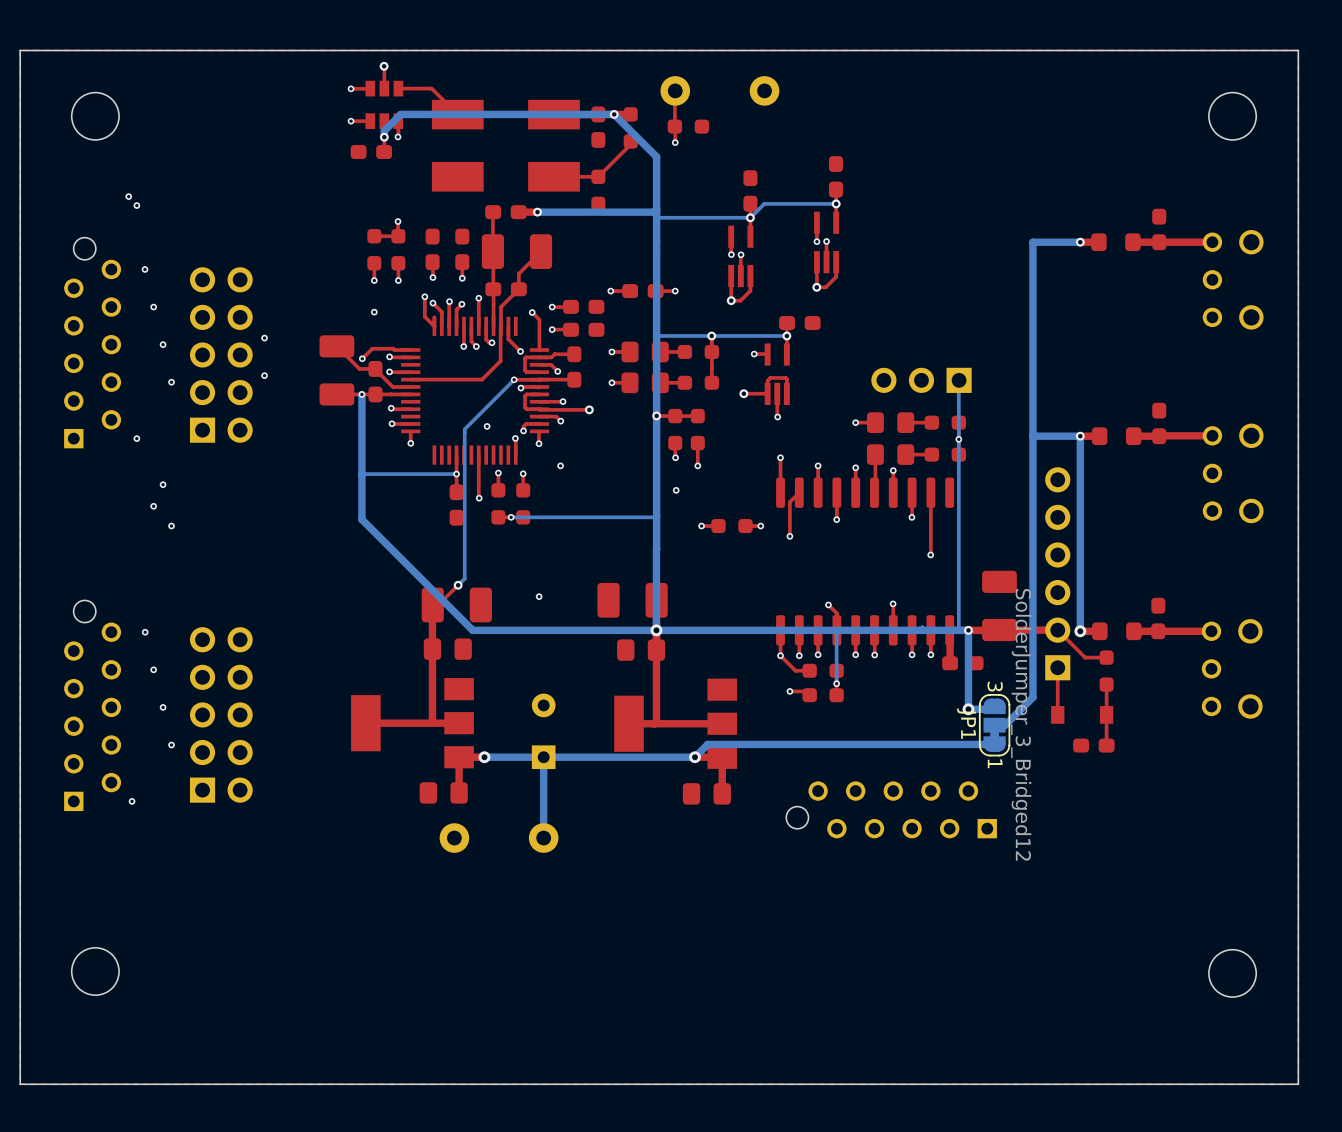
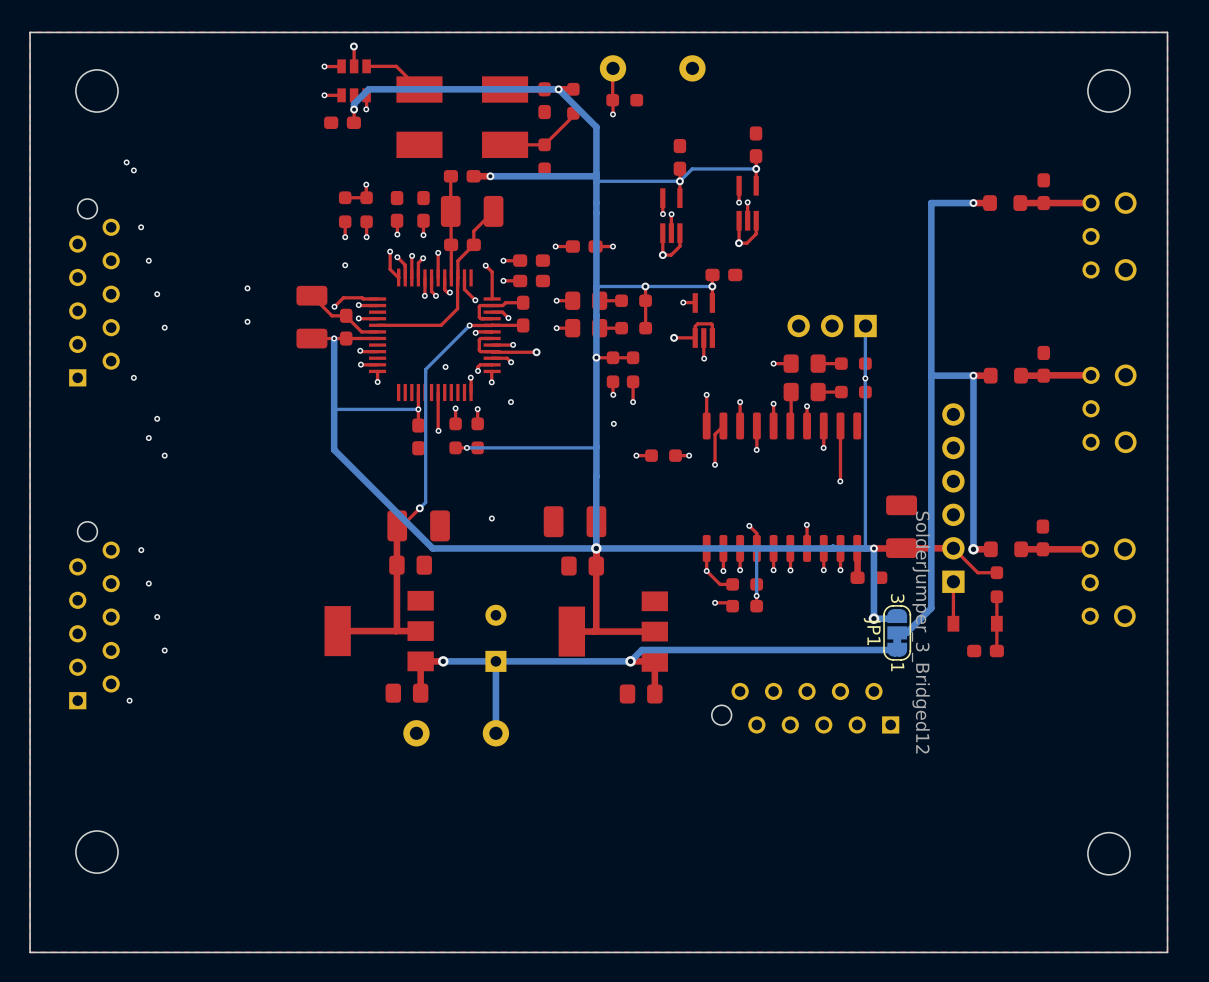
part: (221, 354) -> none
part: (221, 714) -> none

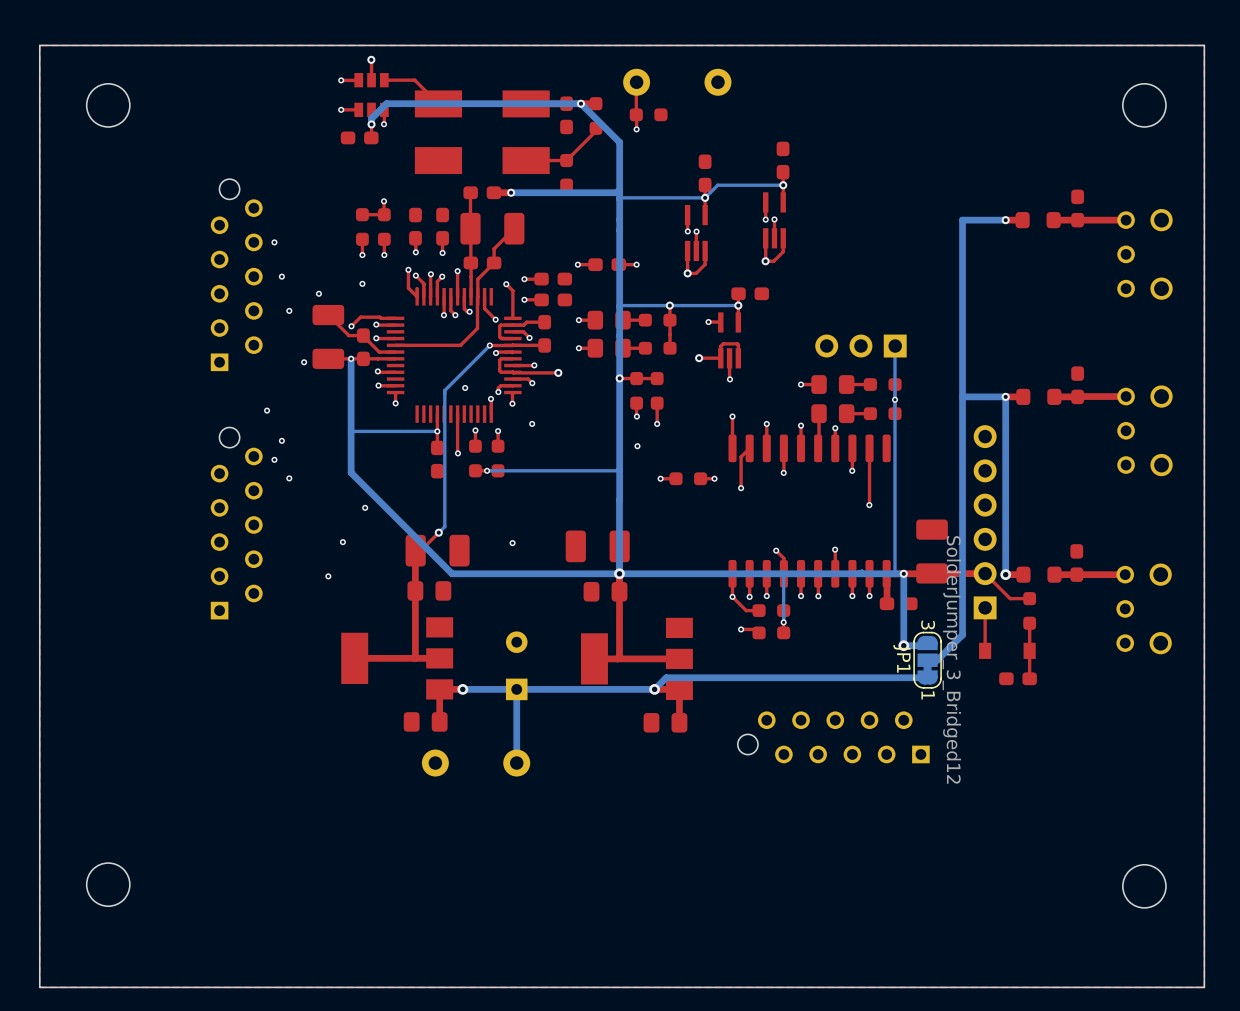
via: (126, 162) -> none
via: (133, 170) -> none
via: none -> (274, 242)
via: (141, 227) -> none
part: none -> (236, 275)
via: none -> (281, 276)
via: (148, 260) -> none
via: none -> (318, 293)
via: (247, 288) -> none
via: none -> (289, 310)
part: (94, 292) -> none
via: (157, 294) -> none
via: (247, 321) -> none
via: (164, 327) -> none
via: none -> (304, 362)
via: (133, 377) -> none
via: none -> (267, 410)
via: (157, 418) -> none
via: none -> (281, 440)
via: none -> (274, 459)
via: (148, 438) -> none
via: (164, 455) -> none
via: none -> (289, 478)
via: none -> (365, 507)
part: none -> (236, 523)
via: none -> (342, 542)
via: (141, 550) -> none
via: none -> (328, 576)
via: (148, 583) -> none
part: (94, 615) -> none
via: (157, 617) -> none
via: (164, 650) -> none
via: (129, 700) -> none

